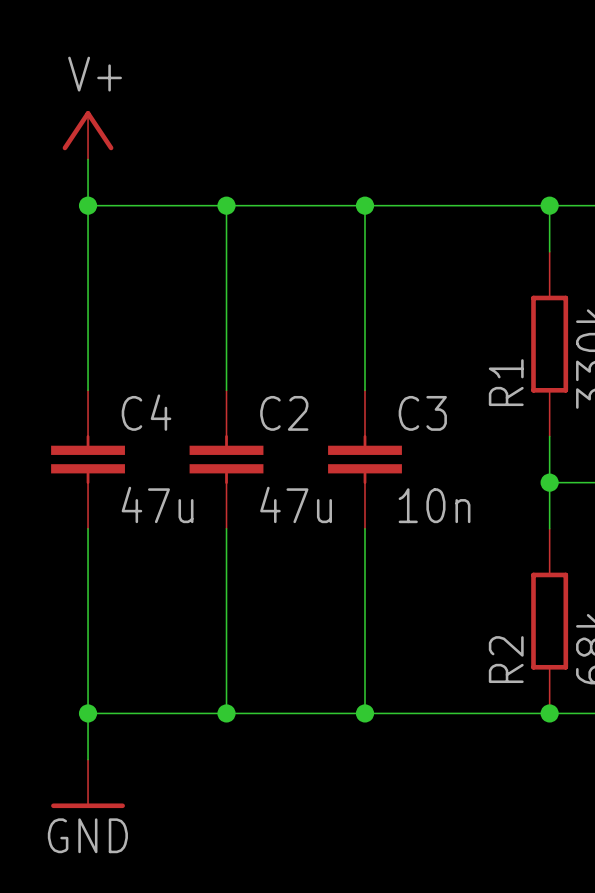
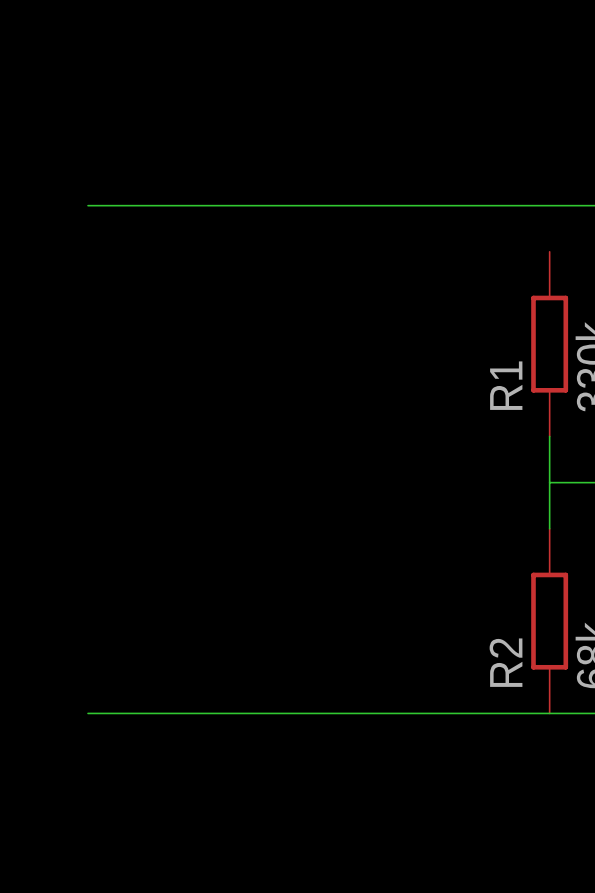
power symbol: V+ (88, 135) -> none
wire: (88, 159) (88, 390) -> none
junction: (88, 205) -> none
wire: (226, 205) (226, 390) -> none
junction: (226, 205) -> none
wire: (365, 205) (365, 390) -> none
junction: (365, 205) -> none
wire: (549, 205) (549, 251) -> none
junction: (549, 205) -> none
C4: 47u (88, 459) -> none
C2: 47u (226, 459) -> none
C3: 10n (365, 459) -> none
junction: (549, 482) -> none
wire: (88, 528) (88, 759) -> none
wire: (226, 528) (226, 713) -> none
wire: (365, 528) (365, 713) -> none
junction: (88, 713) -> none
junction: (226, 713) -> none
junction: (365, 713) -> none
junction: (549, 713) -> none
power symbol: GND (88, 783) -> none

